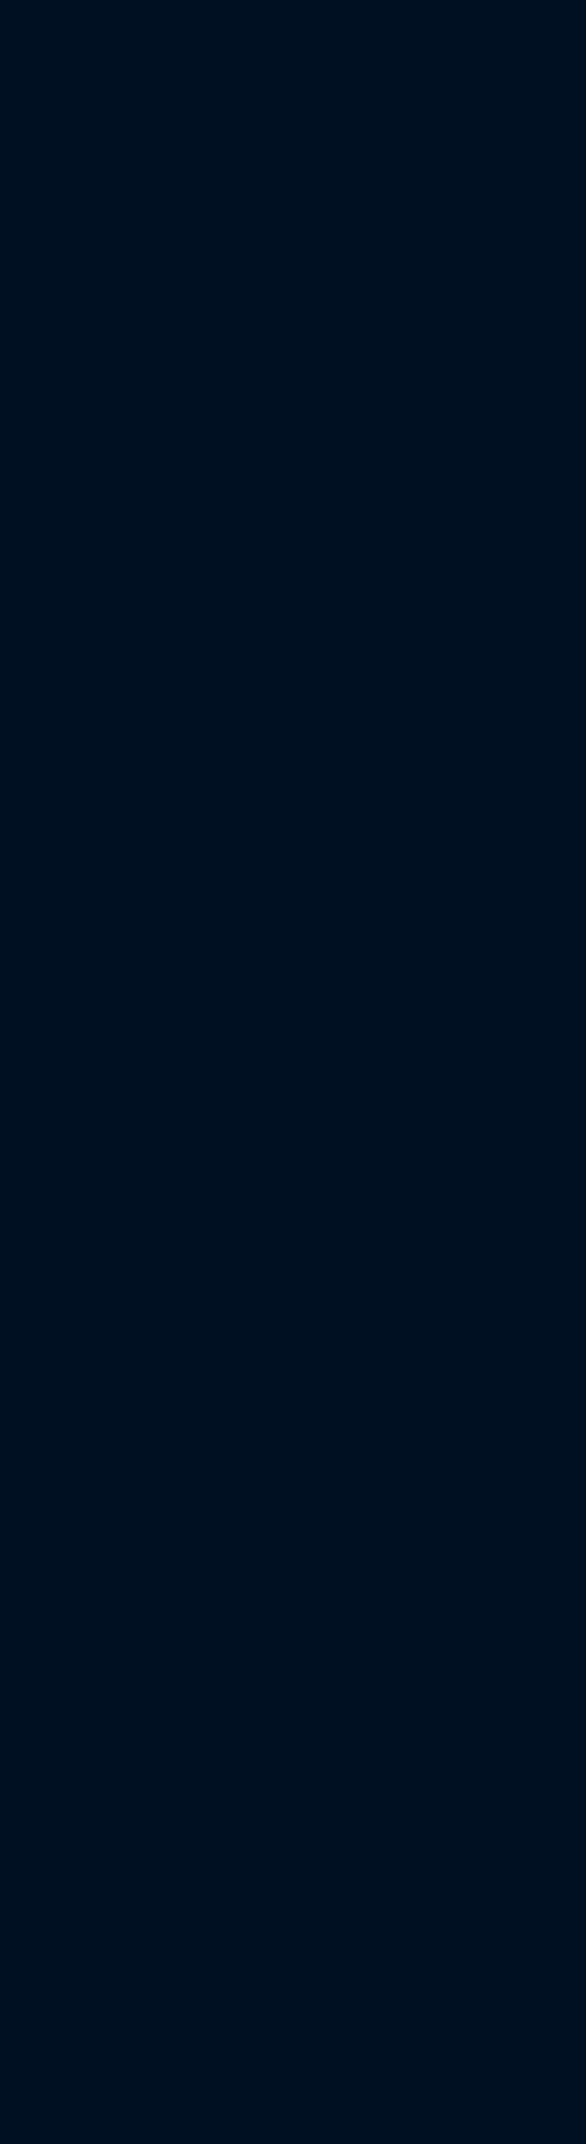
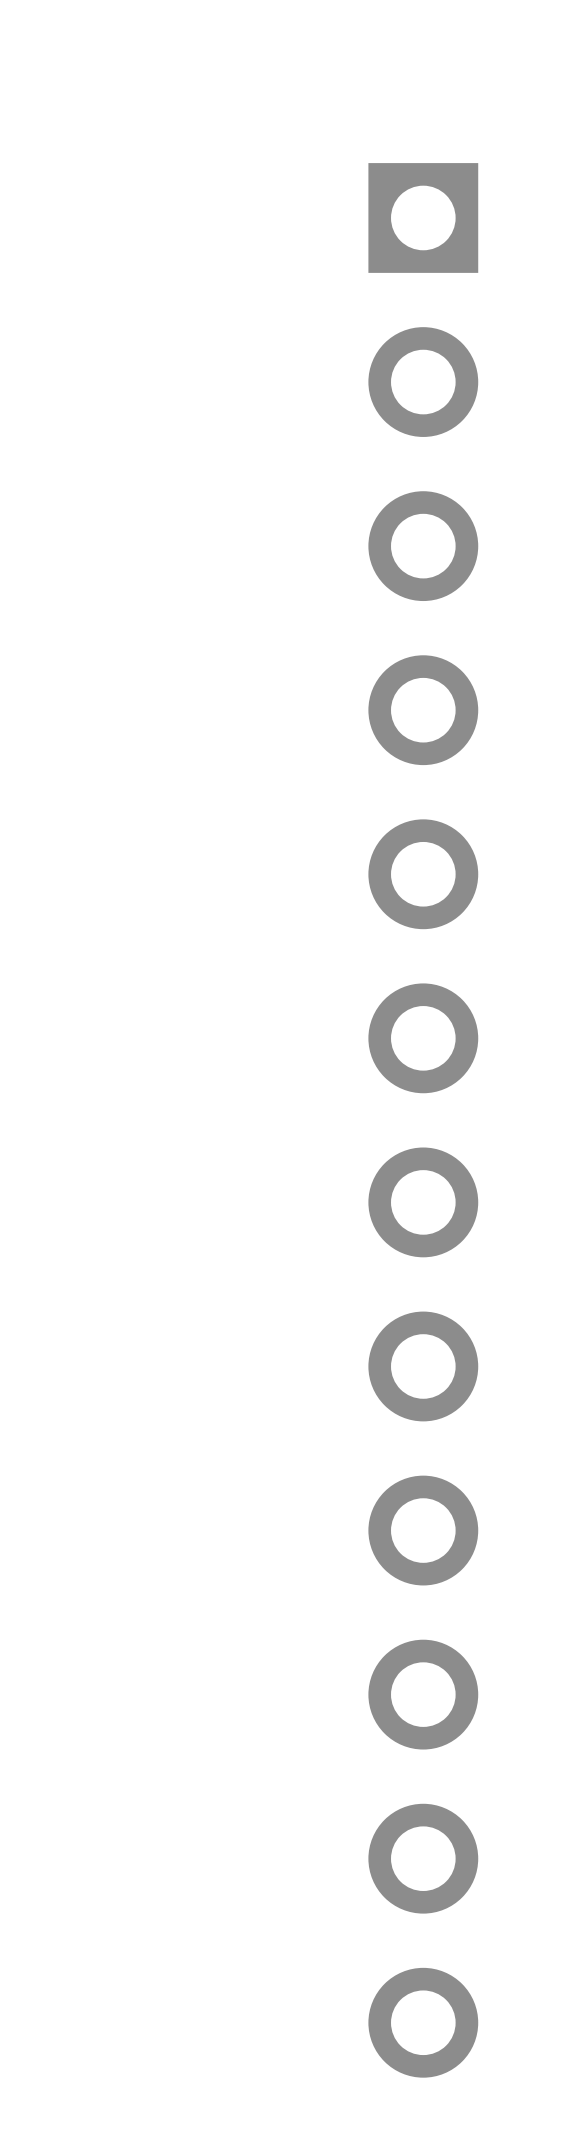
part: none -> (423, 1120)

